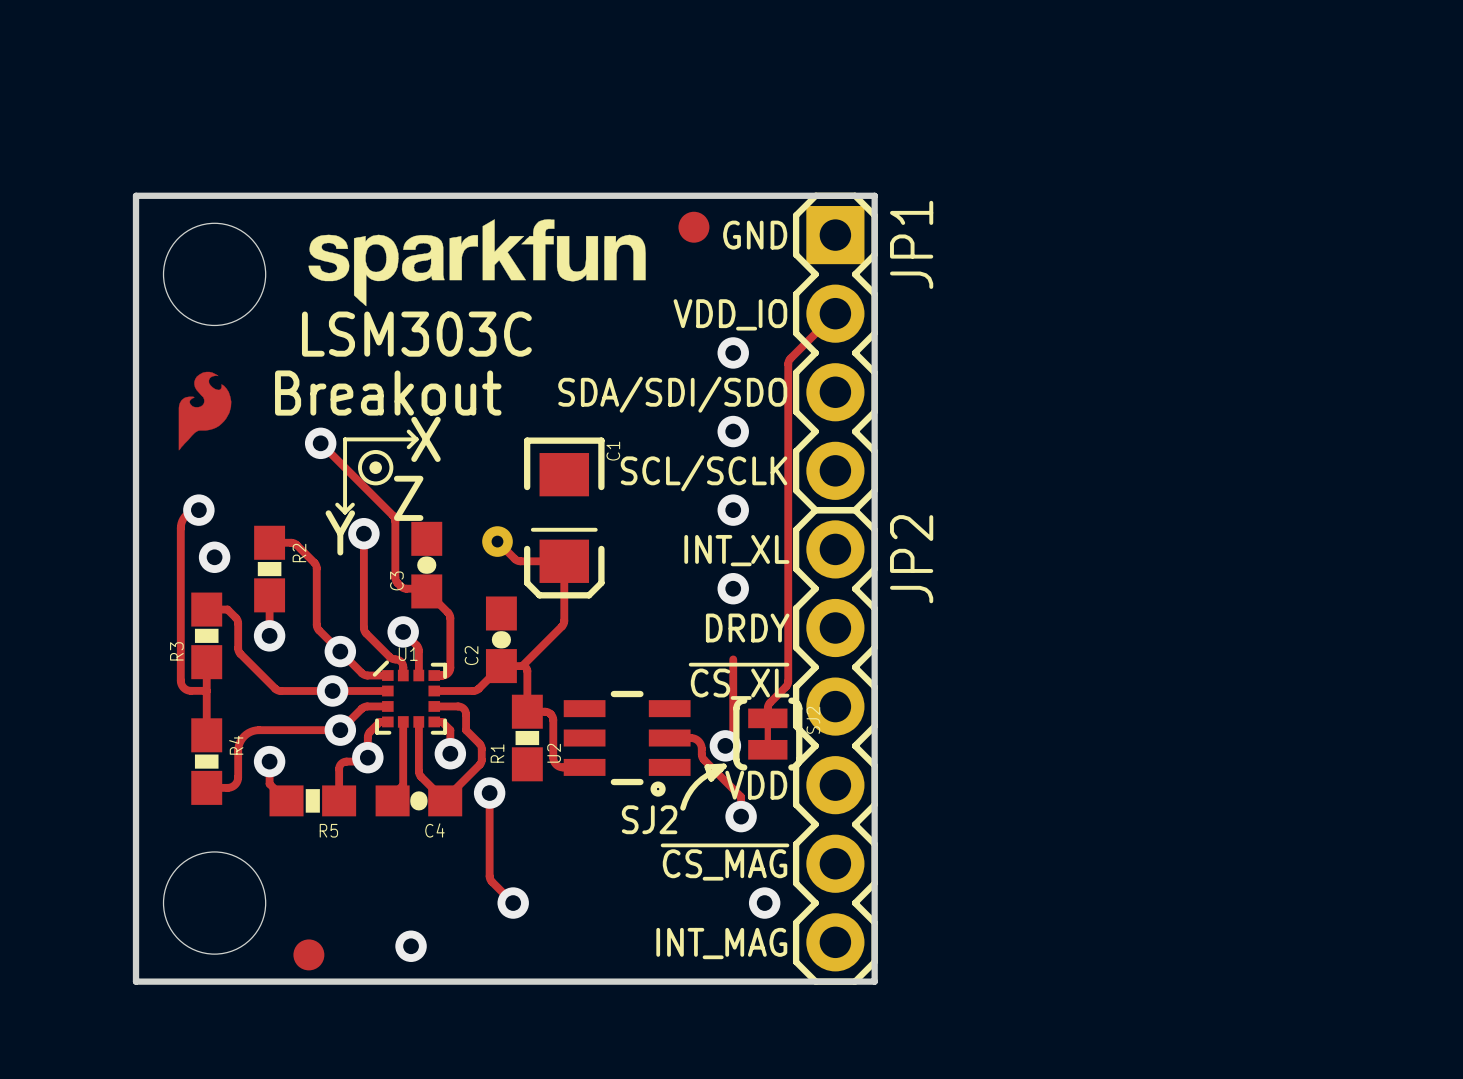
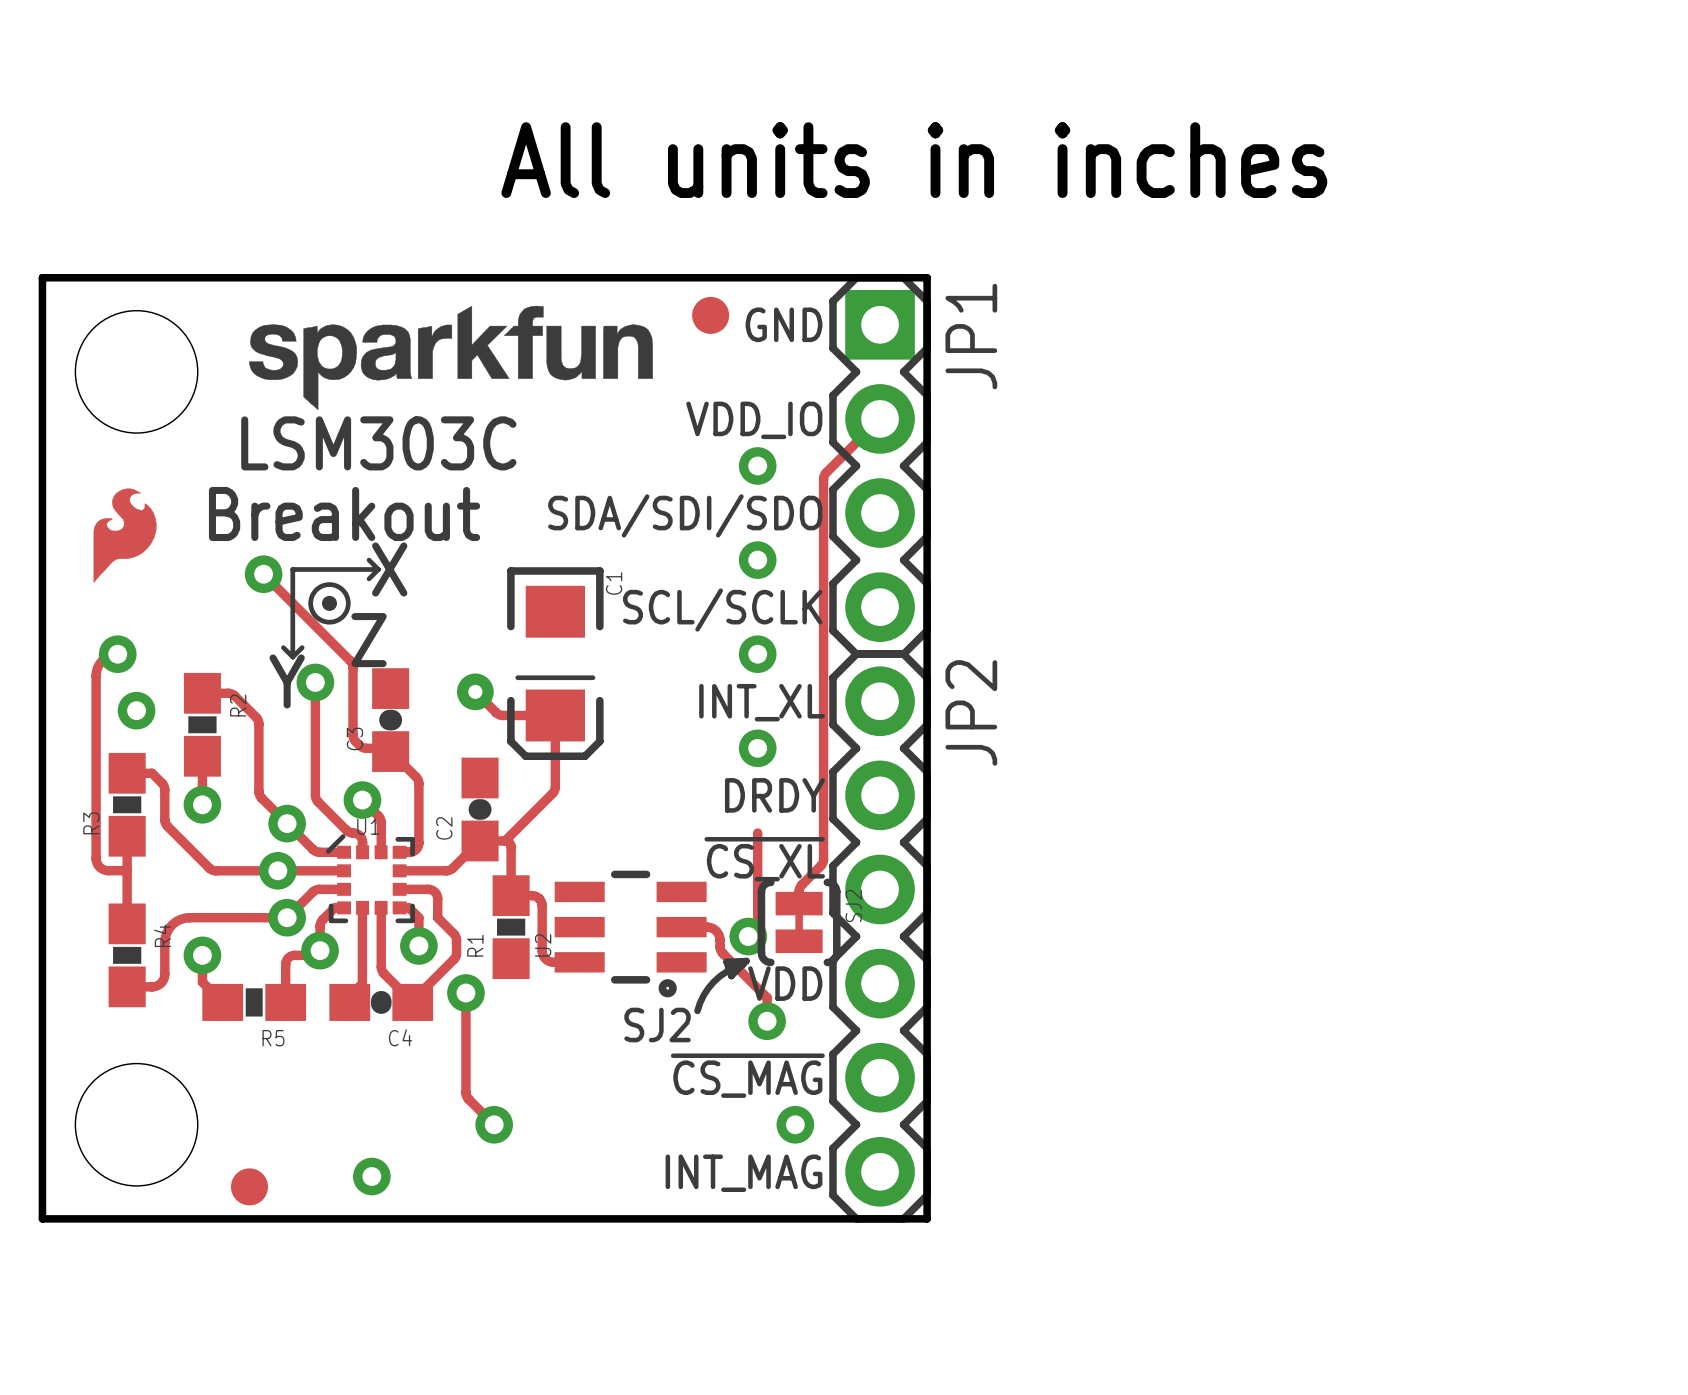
text: none -> All units in inches (914, 160)

